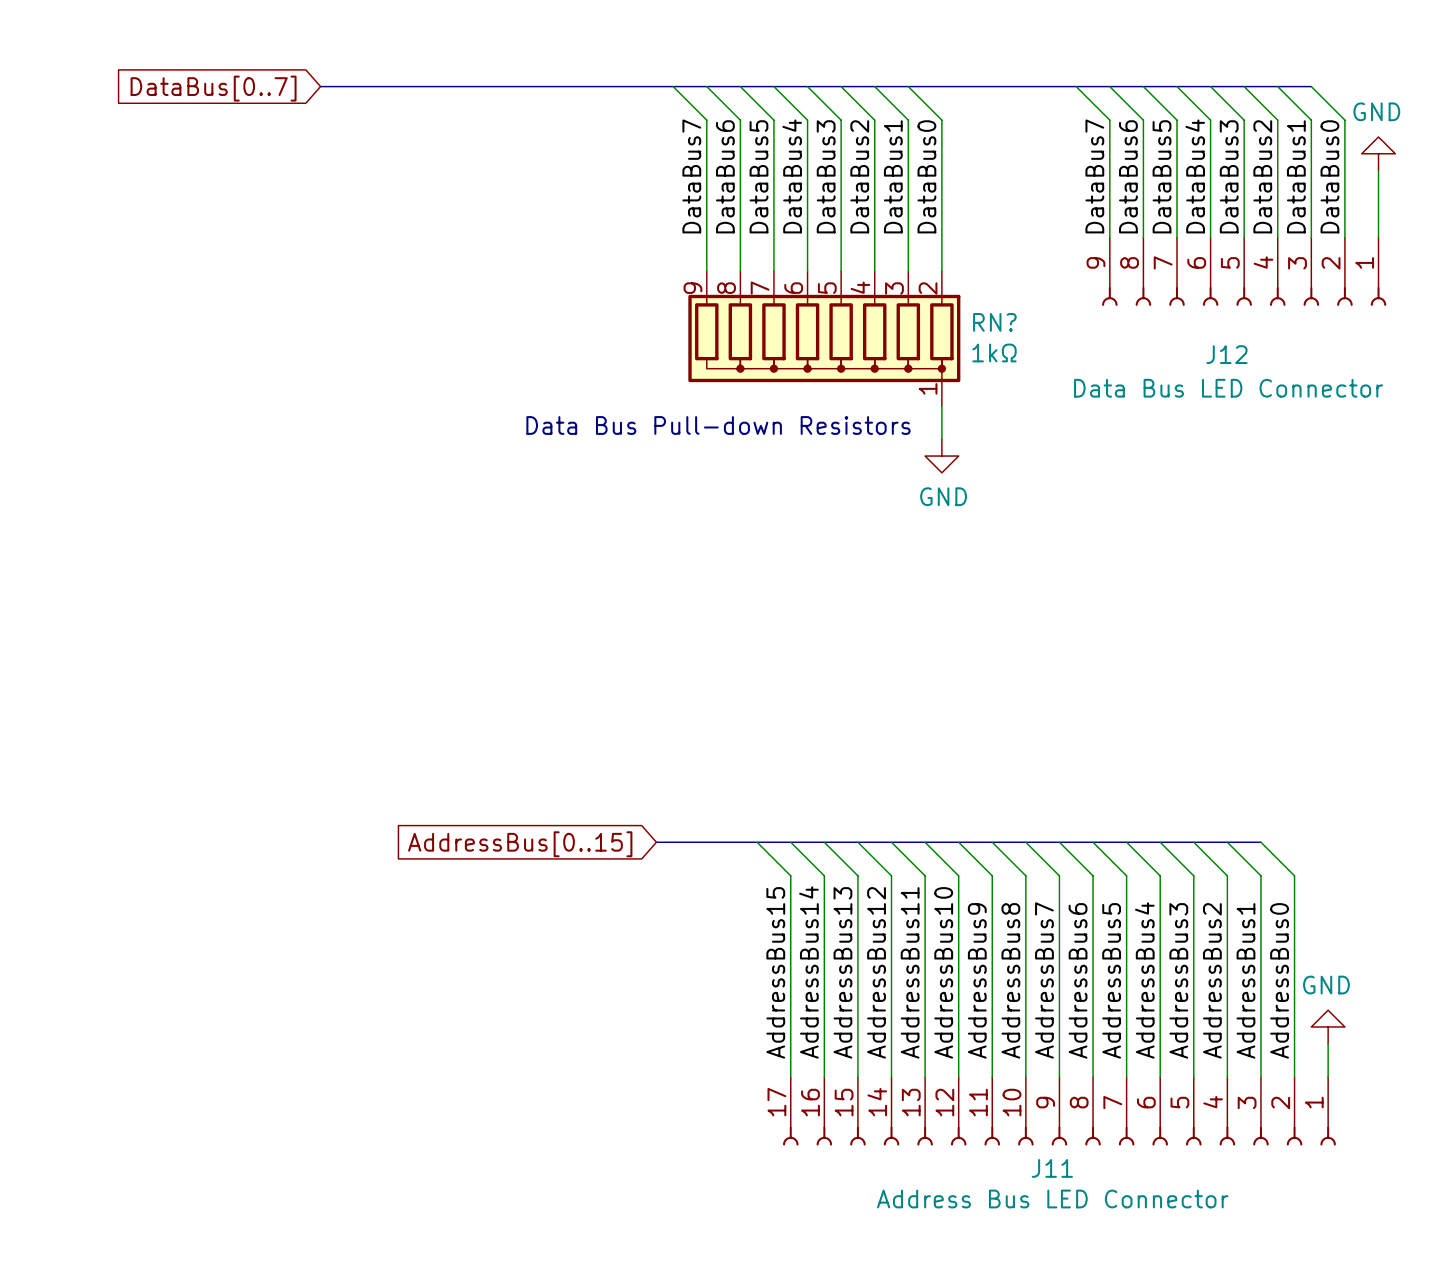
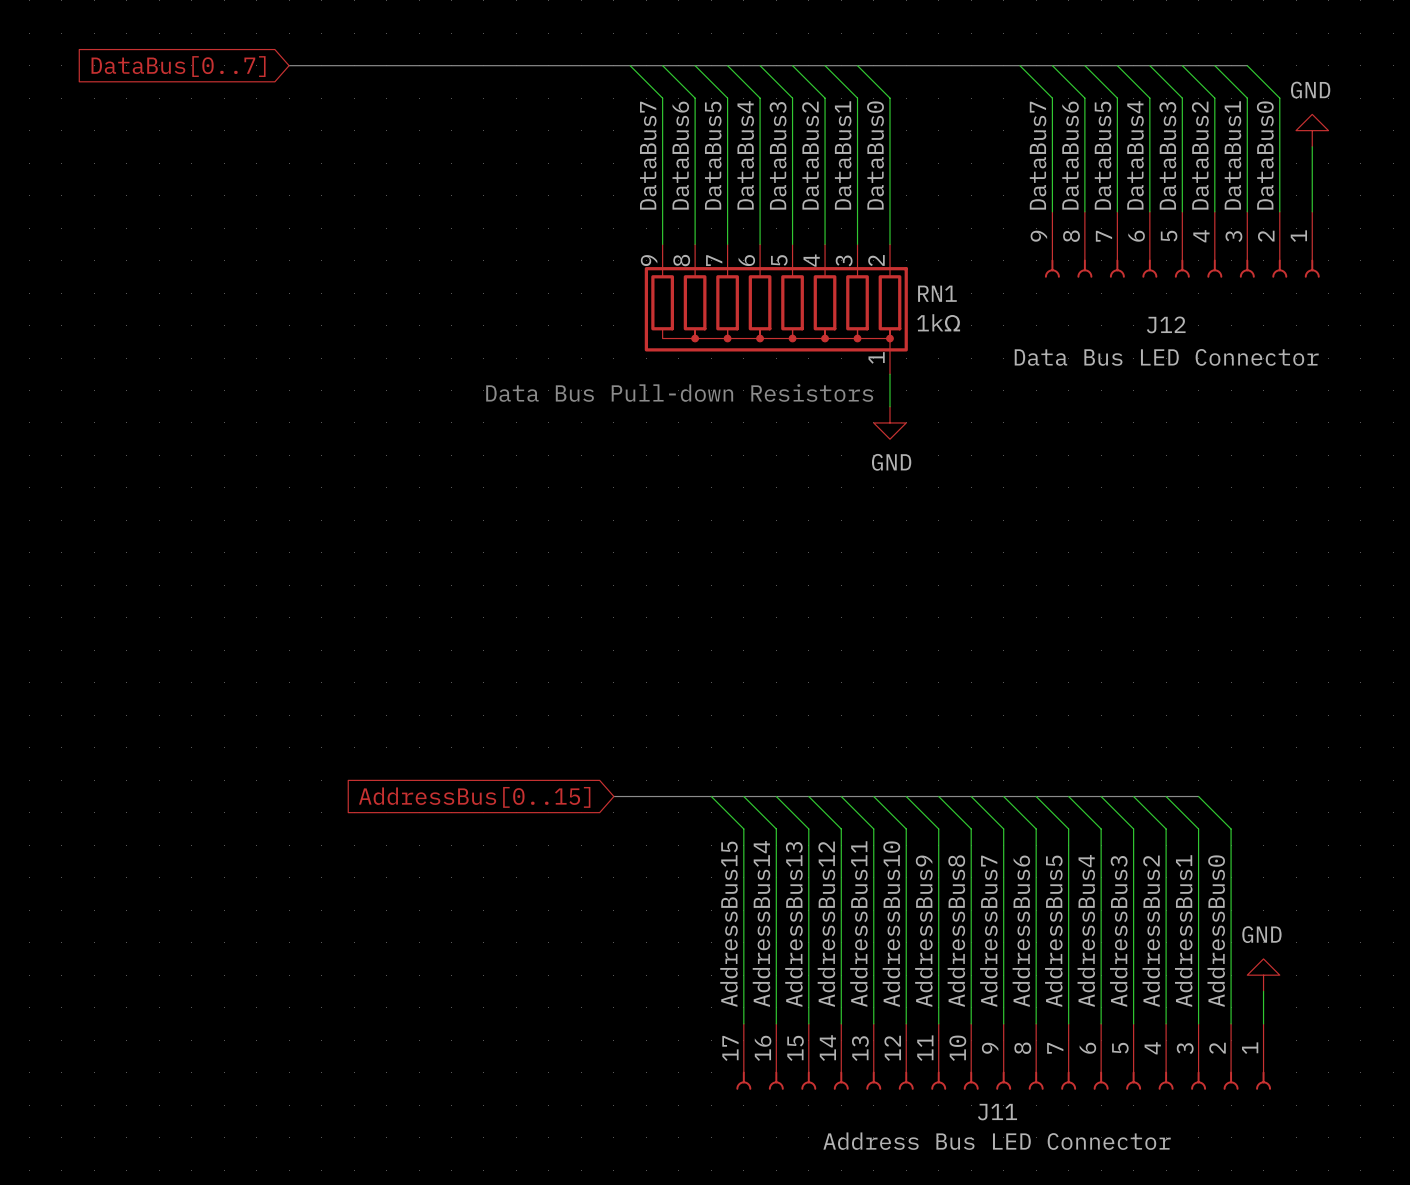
RN? name: RN? (994, 322) -> RN1 (937, 293)

